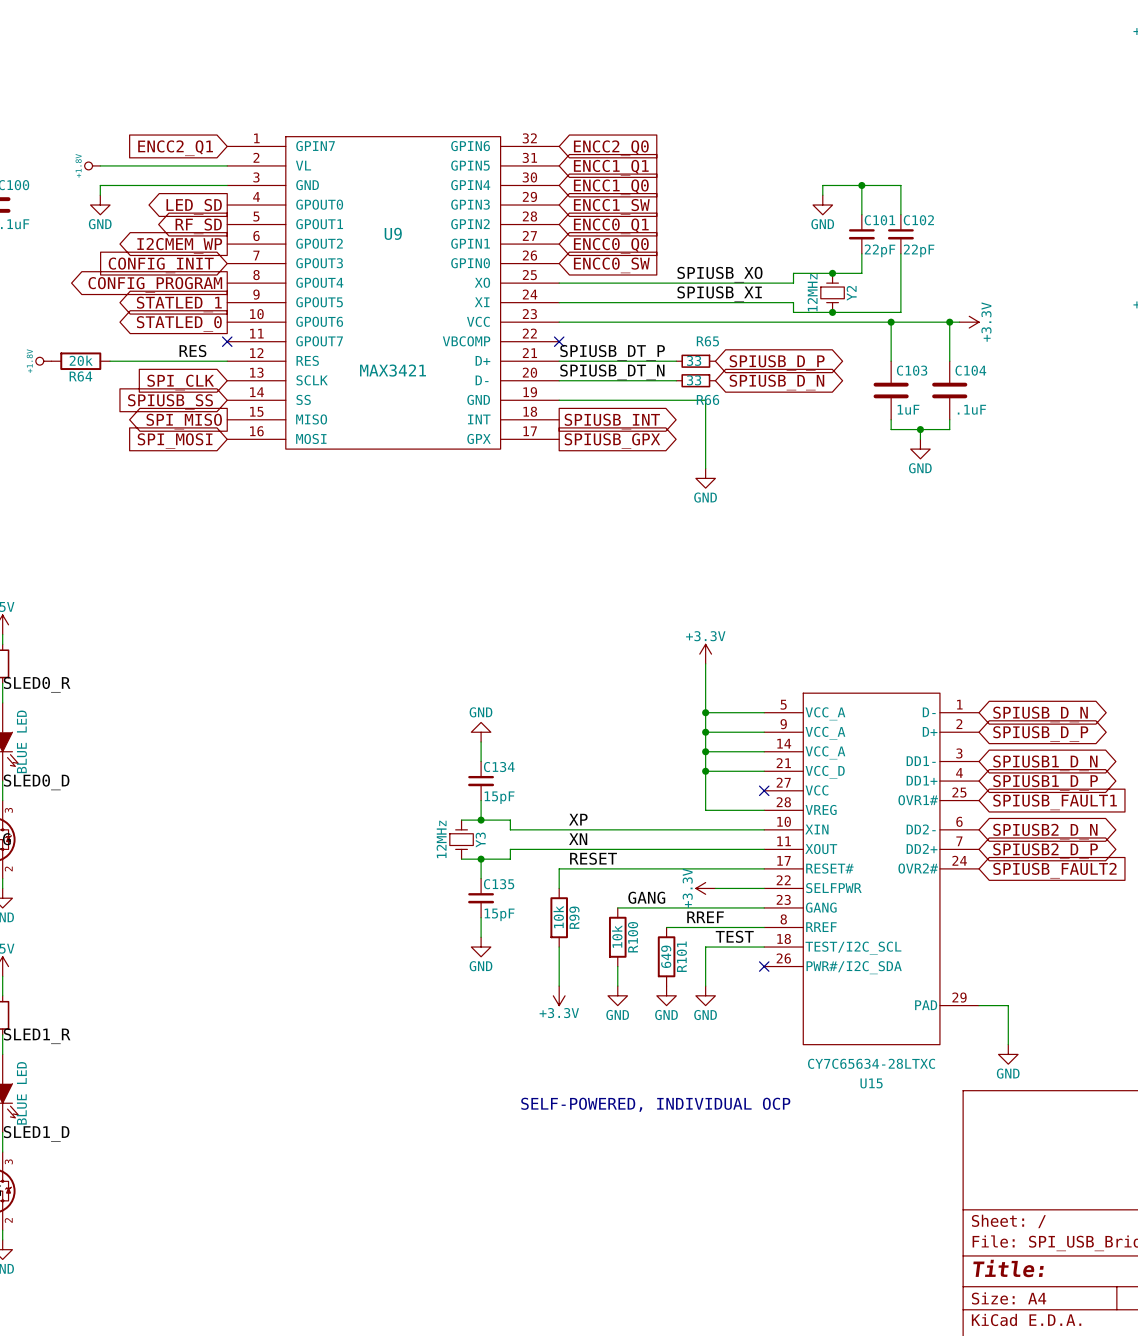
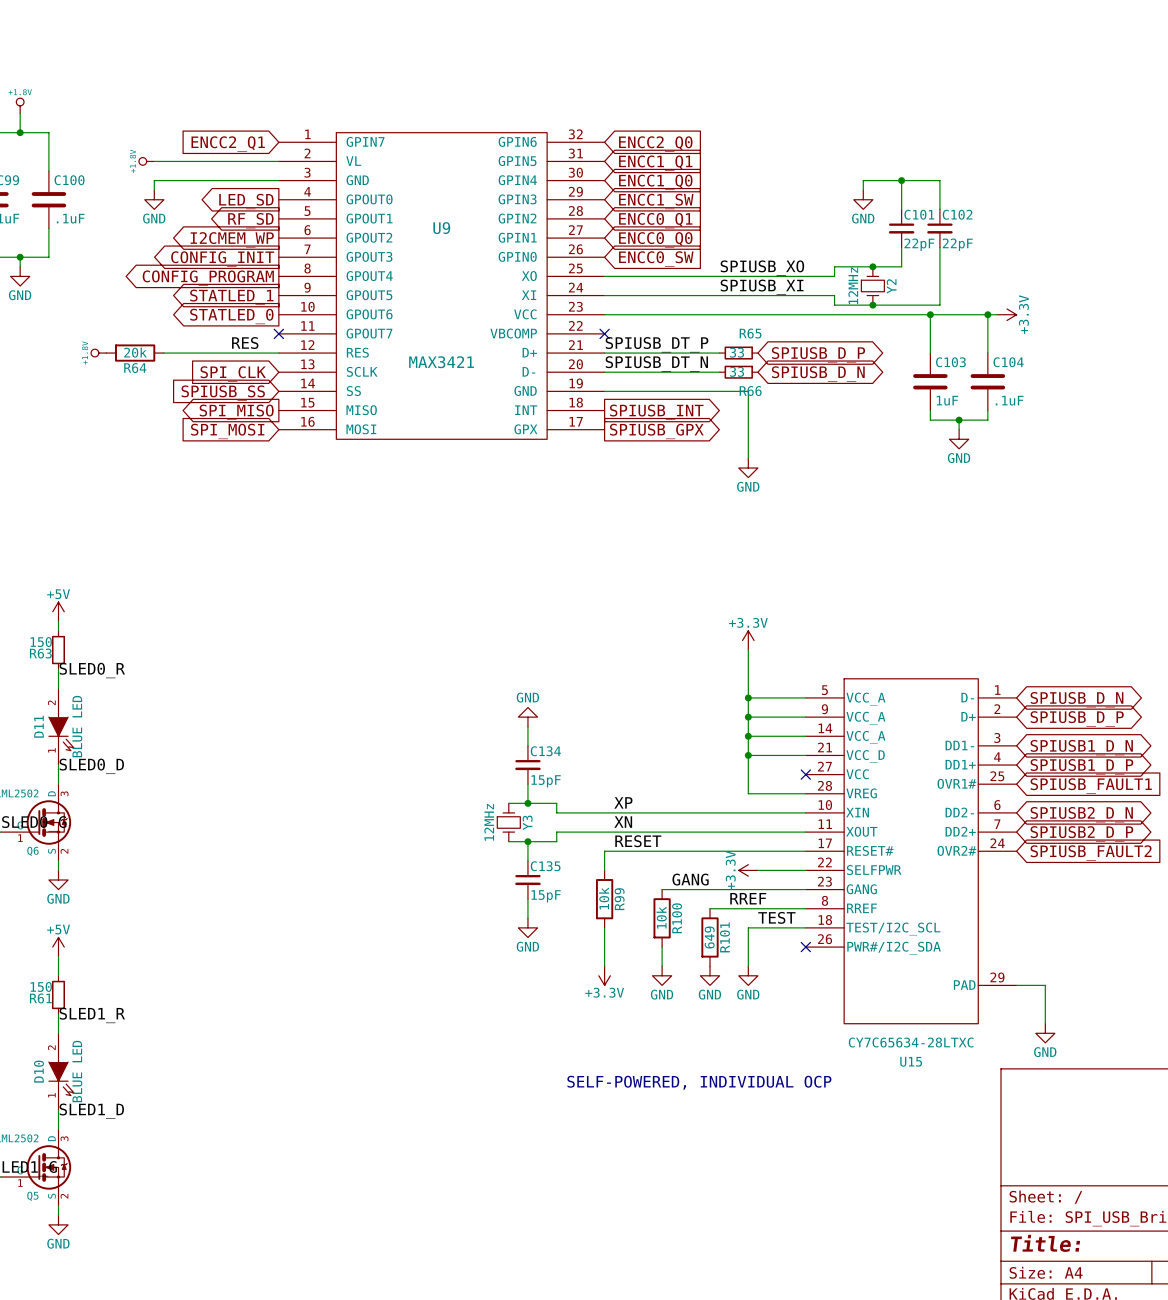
global label shape: input (161, 265) -> output (222, 258)

